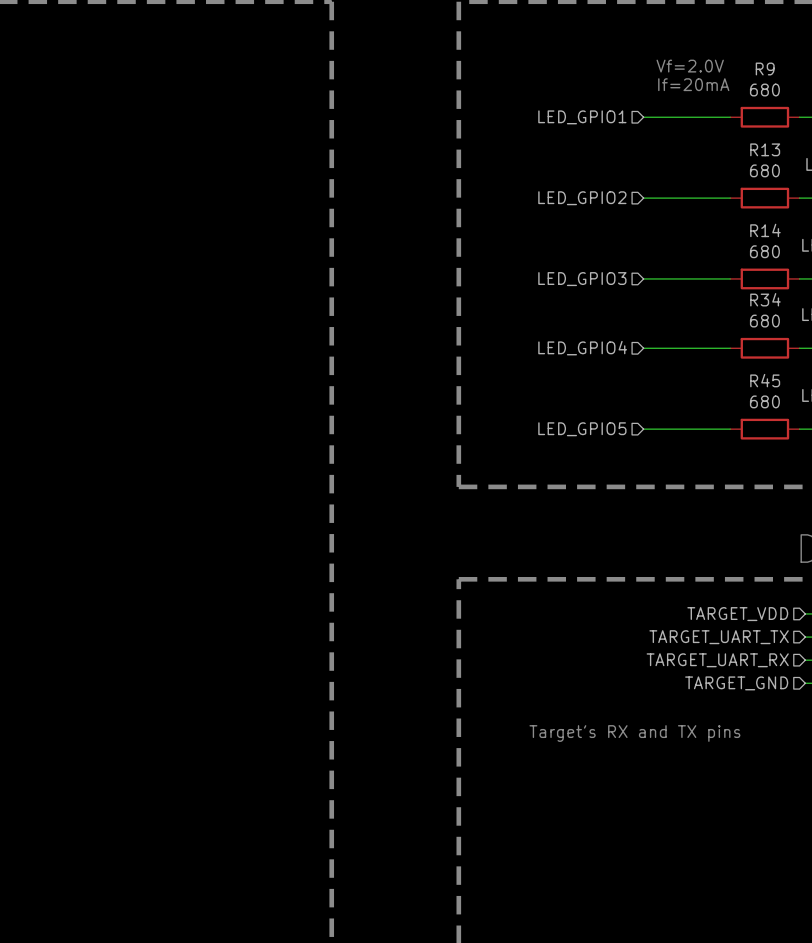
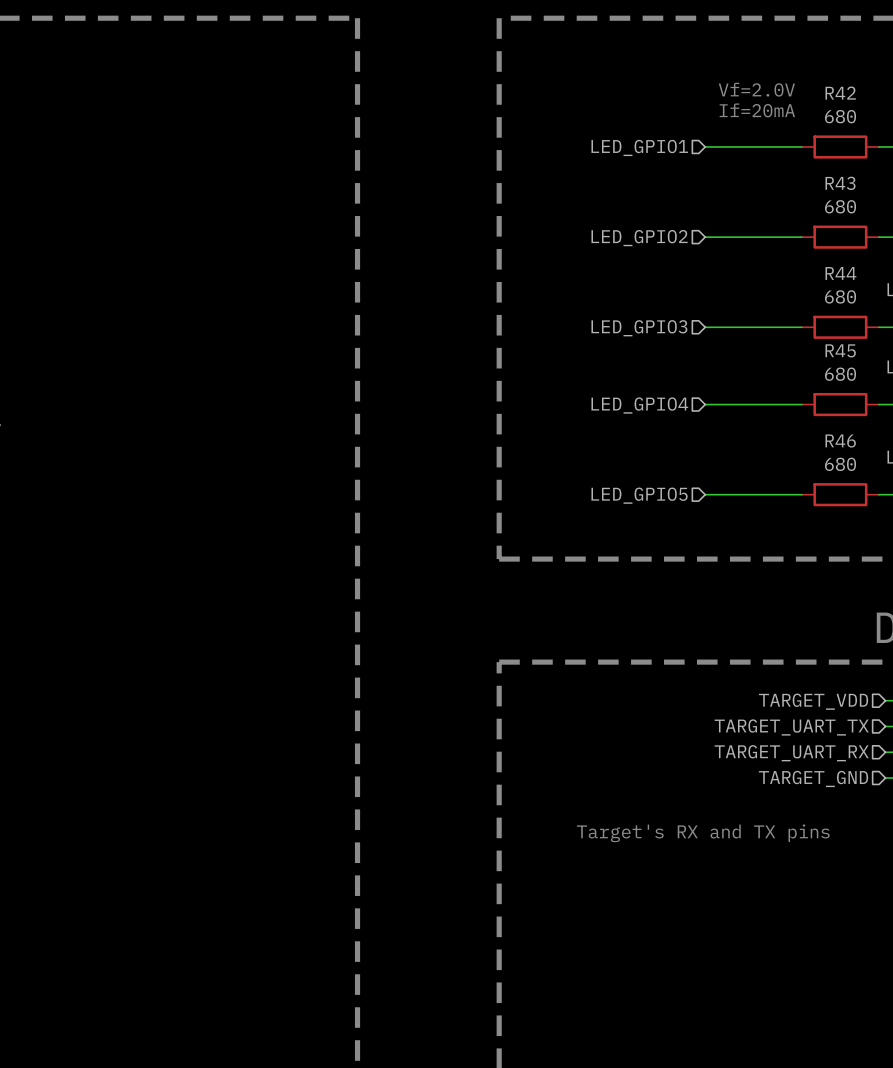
R9 name: R9 (765, 68) -> R42 (840, 93)
R13 name: R13 (765, 149) -> R43 (840, 183)
R14 name: R14 (765, 230) -> R44 (840, 273)
R34 name: R34 (765, 299) -> R45 (840, 350)
R45 name: R45 (765, 380) -> R46 (840, 441)

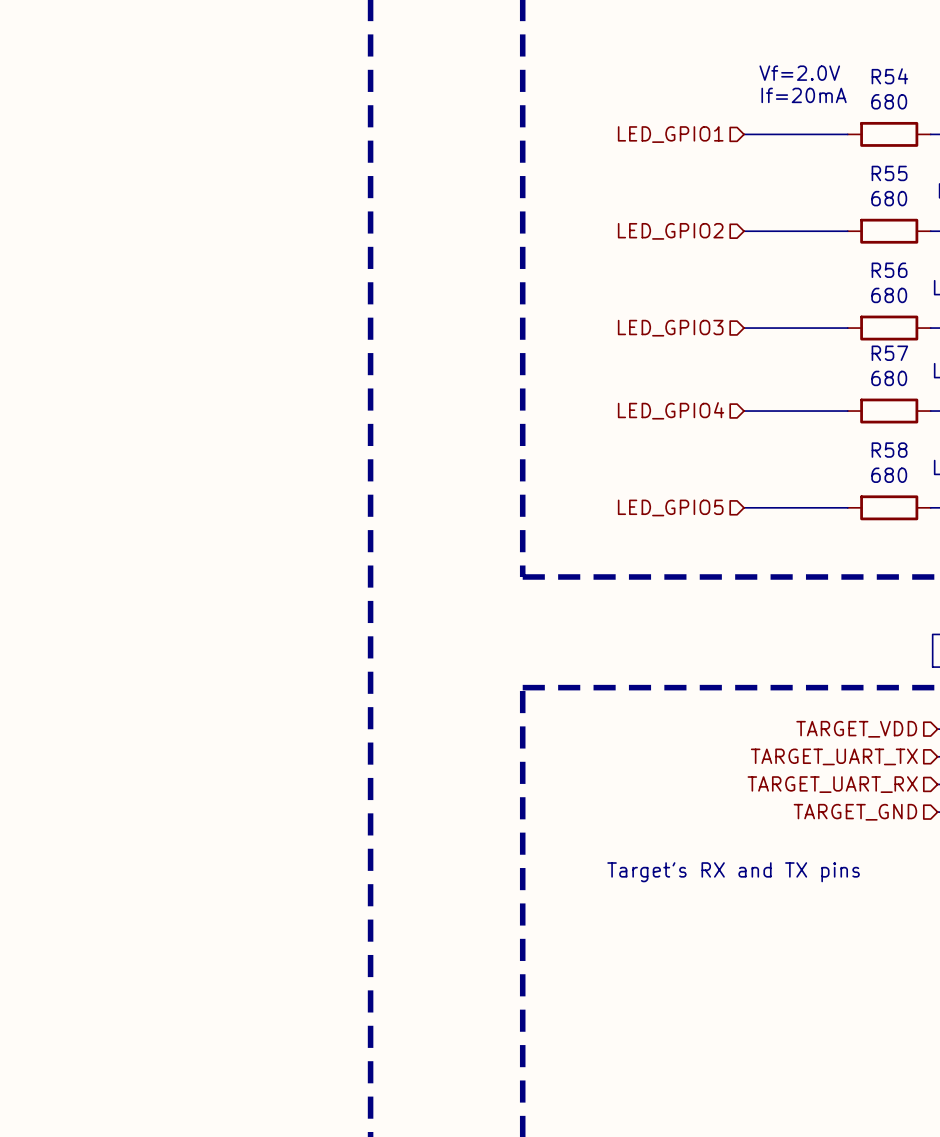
R42 name: R42 (840, 93) -> R54 (889, 76)
R43 name: R43 (840, 183) -> R55 (889, 173)
R44 name: R44 (840, 273) -> R56 (889, 270)
R45 name: R45 (840, 350) -> R57 (889, 353)
R46 name: R46 (840, 441) -> R58 (889, 450)

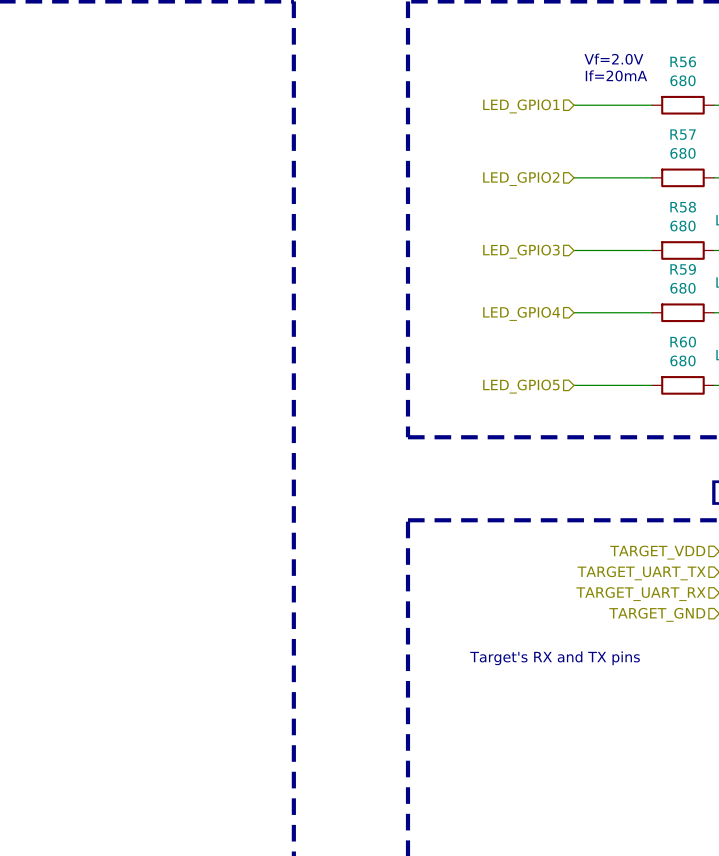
R54 name: R54 (889, 76) -> R56 (683, 61)
R55 name: R55 (889, 173) -> R57 (683, 134)
R56 name: R56 (889, 270) -> R58 (683, 207)
R57 name: R57 (889, 353) -> R59 (683, 269)
R58 name: R58 (889, 450) -> R60 (683, 342)

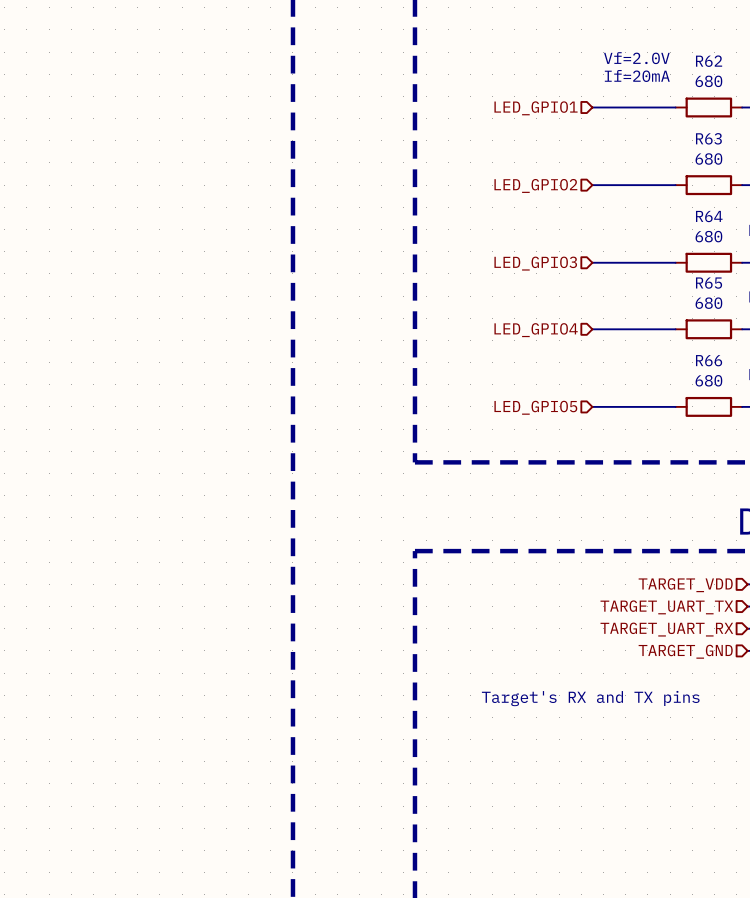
R56 name: R56 (683, 61) -> R62 (709, 61)
R57 name: R57 (683, 134) -> R63 (708, 138)
R58 name: R58 (683, 207) -> R64 (709, 216)
R59 name: R59 (683, 269) -> R65 (709, 283)
R60 name: R60 (683, 342) -> R66 (709, 360)

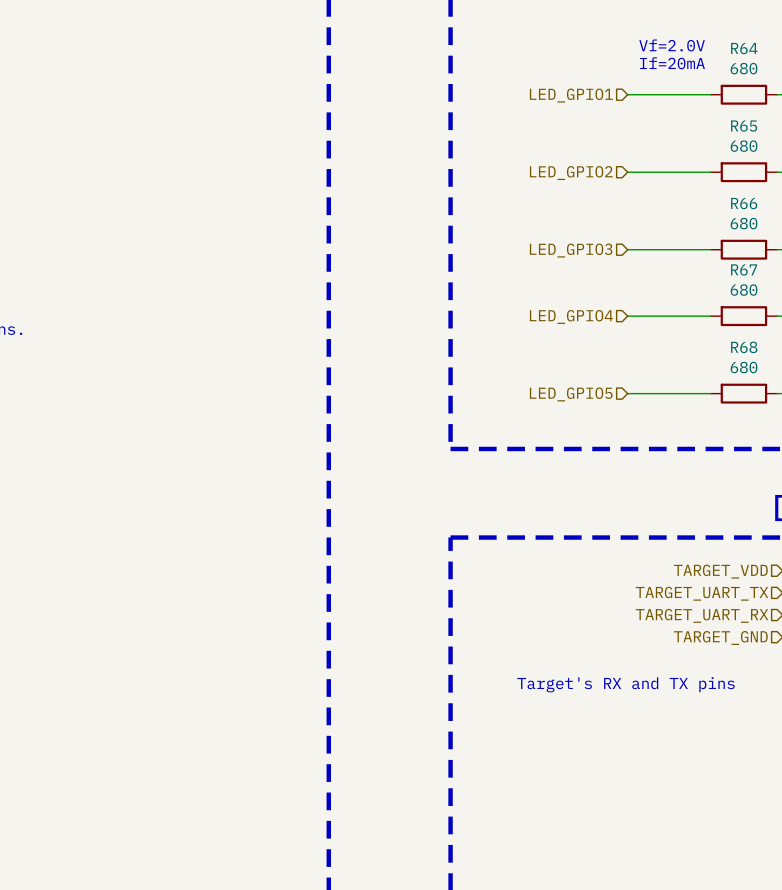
R62 name: R62 (709, 61) -> R64 (744, 48)
R63 name: R63 (708, 138) -> R65 (744, 126)
R64 name: R64 (709, 216) -> R66 (744, 203)
R65 name: R65 (709, 283) -> R67 (744, 269)
R66 name: R66 (709, 360) -> R68 (744, 347)

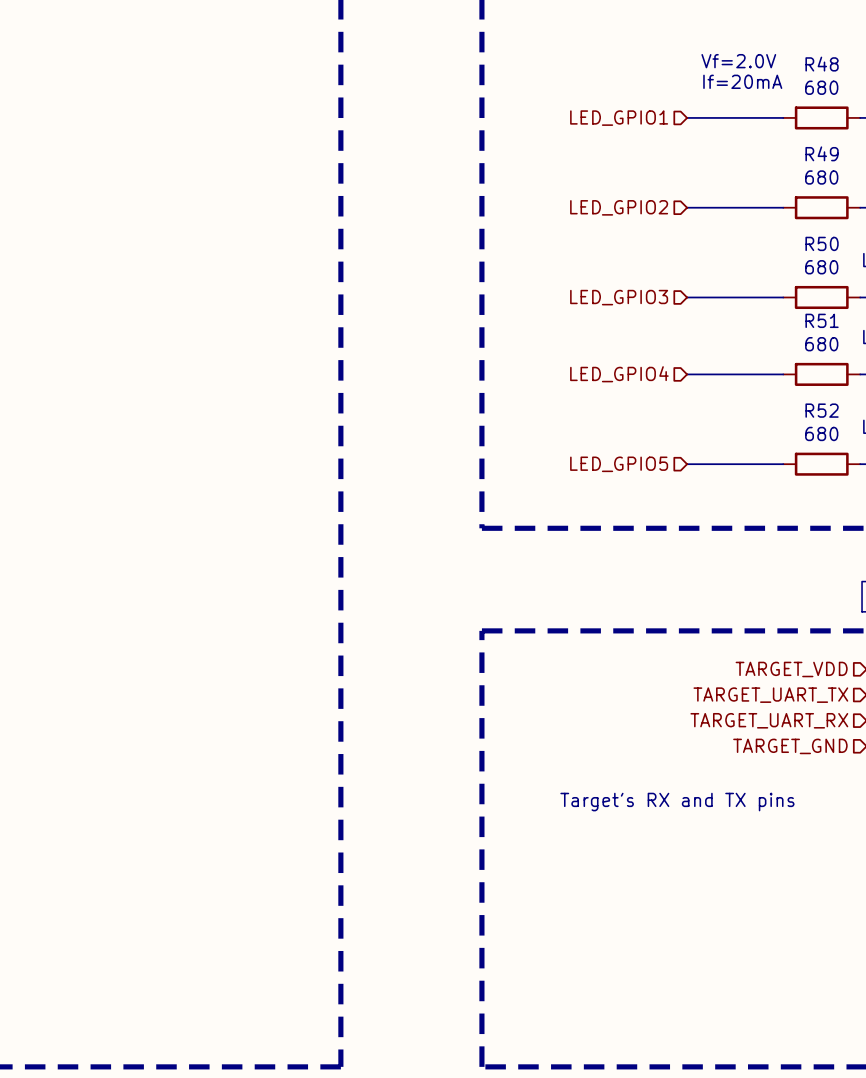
R64 name: R64 (744, 48) -> R48 (822, 64)
R65 name: R65 (744, 126) -> R49 (822, 153)
R66 name: R66 (744, 203) -> R50 (822, 243)
R67 name: R67 (744, 269) -> R51 (822, 320)
R68 name: R68 (744, 347) -> R52 (822, 410)

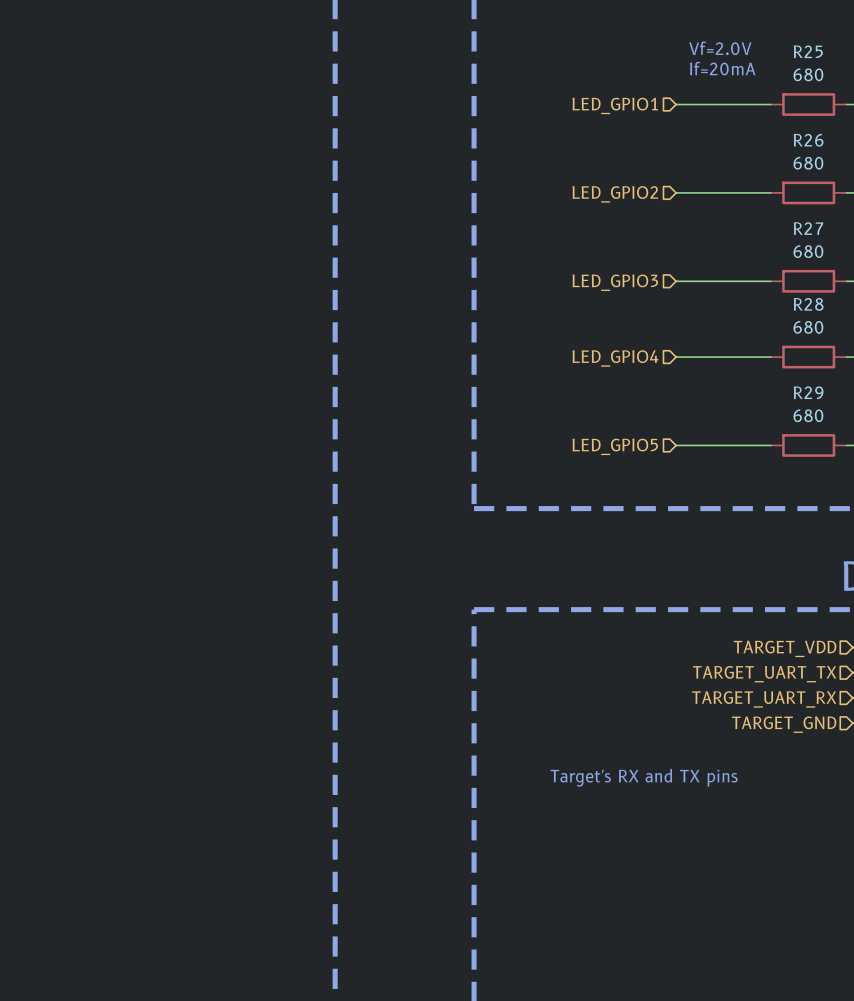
R48 name: R48 (822, 64) -> R25 (808, 51)
R49 name: R49 (822, 153) -> R26 (808, 140)
R50 name: R50 (822, 243) -> R27 (808, 228)
R51 name: R51 (822, 320) -> R28 (808, 304)
R52 name: R52 (822, 410) -> R29 (808, 392)

